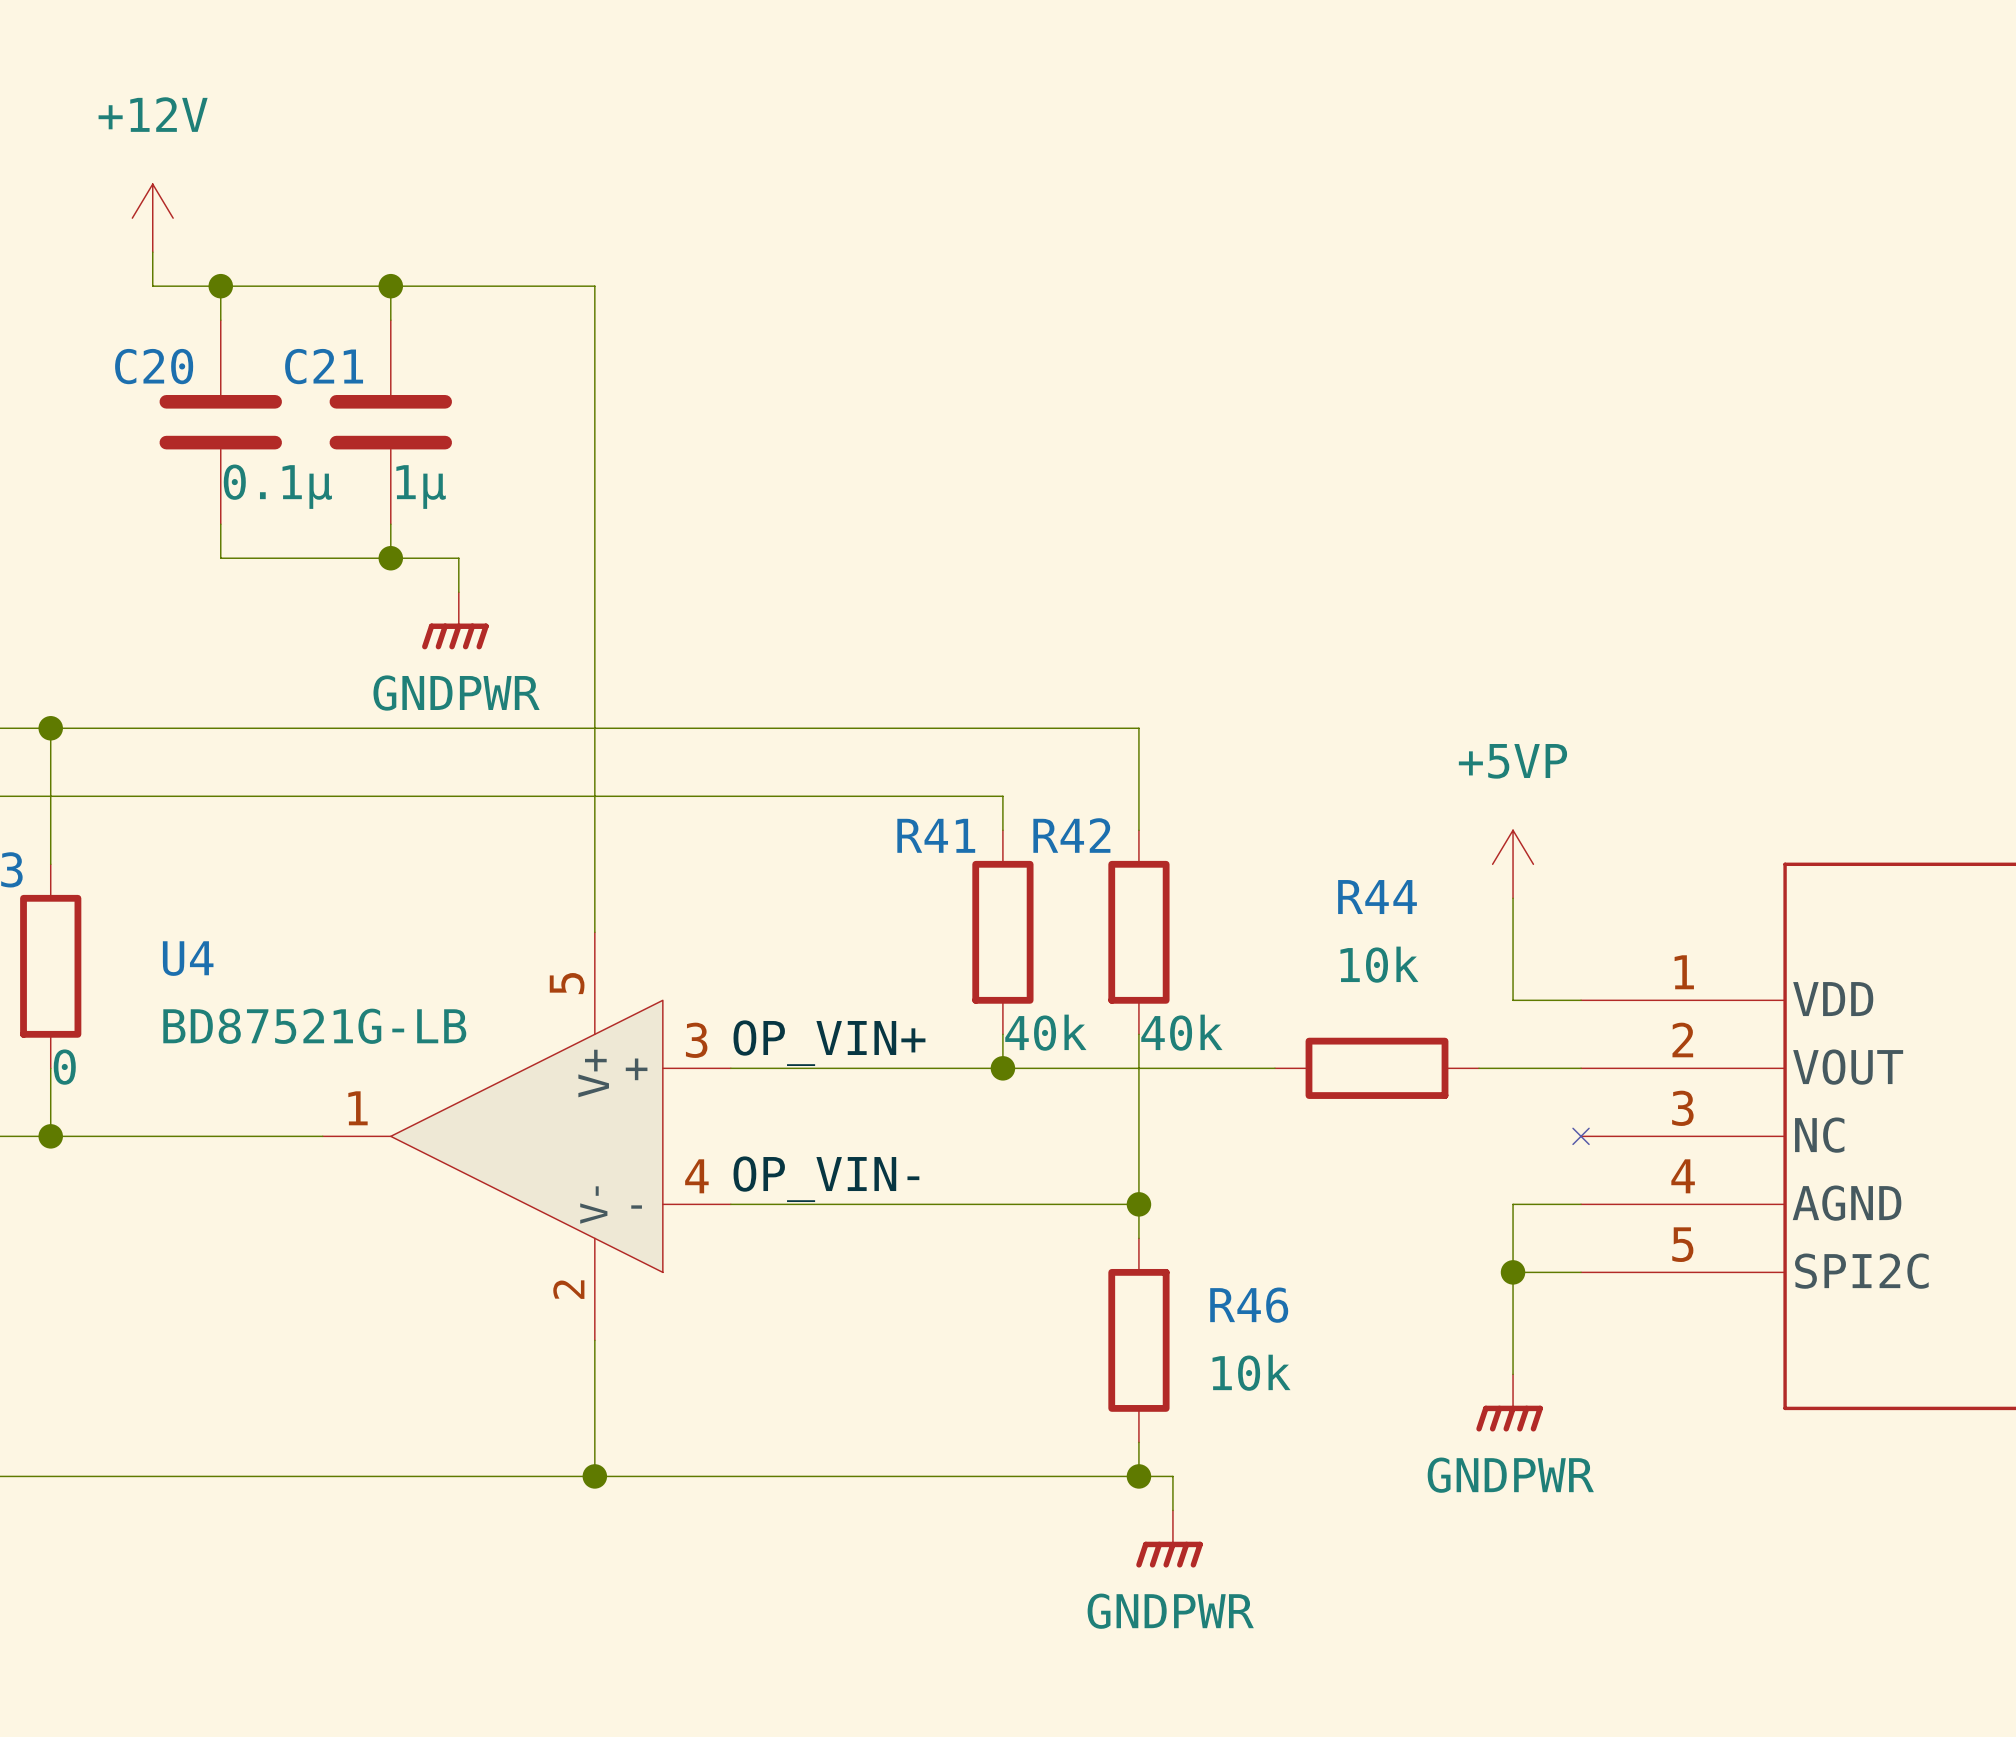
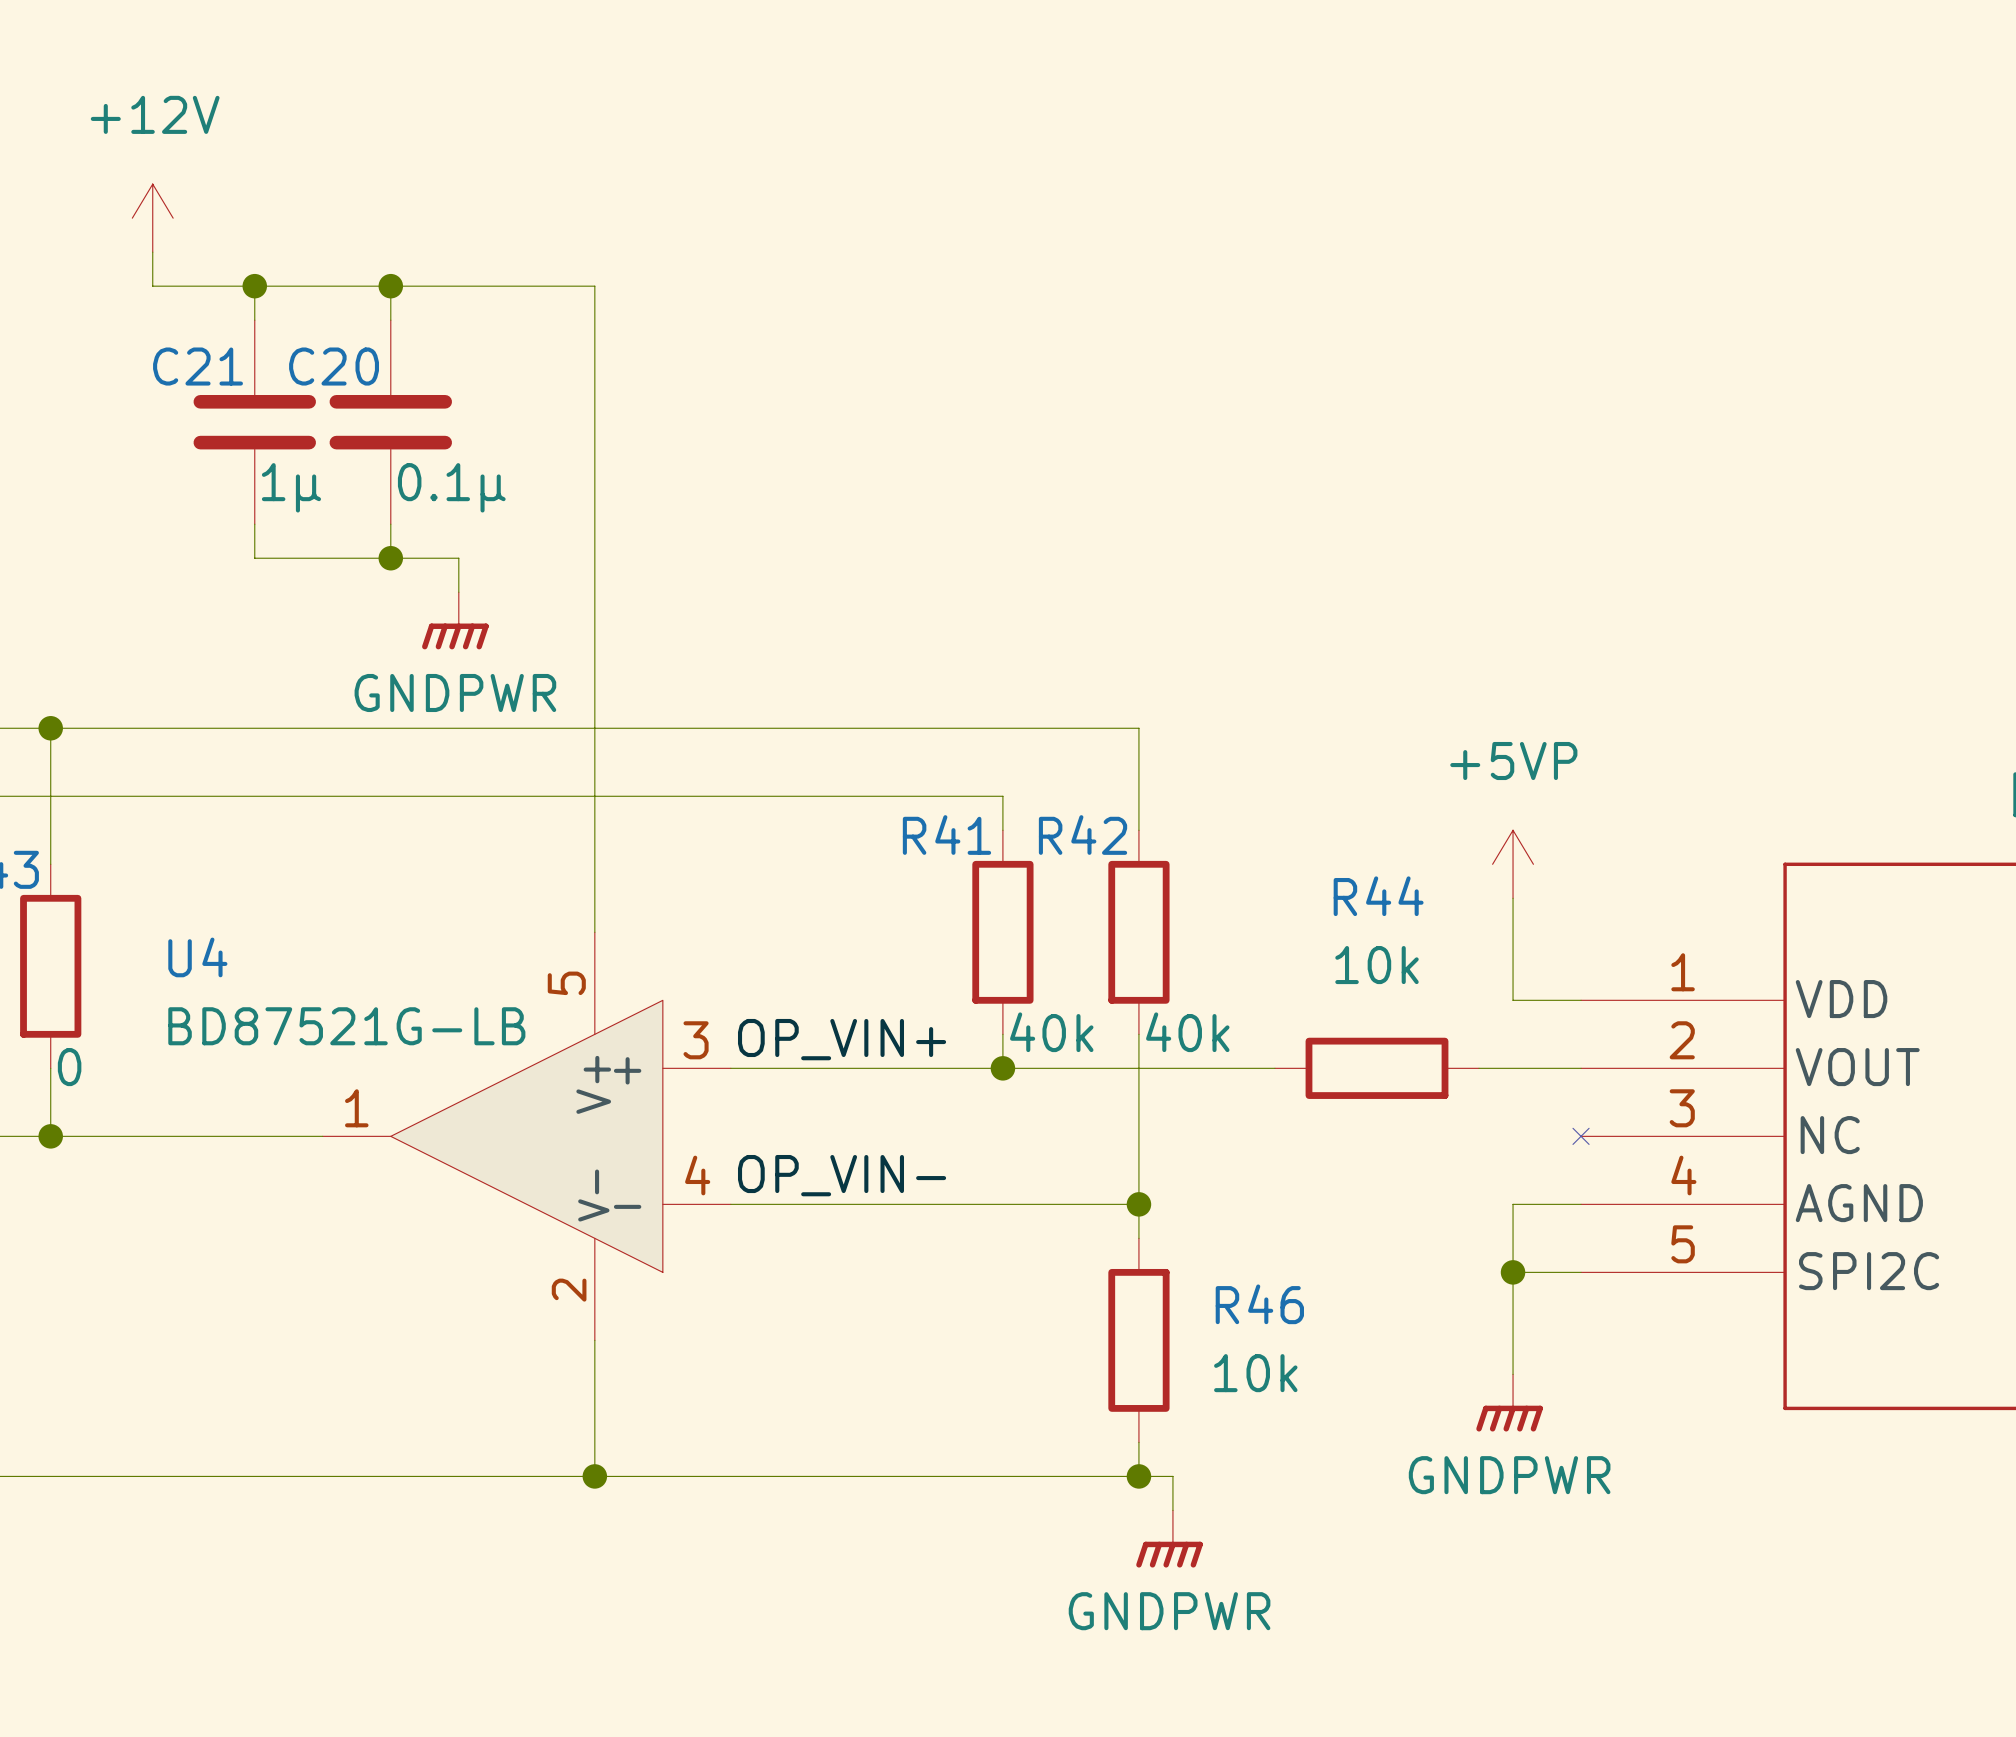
wire: (220, 286) (220, 320) -> (254, 286) (254, 320)
junction position: (220, 286) -> (254, 286)
C21 name: C21 (324, 366) -> C20 (334, 366)
C20: 0.1μ (220, 422) -> none
C21: none -> 1μ (254, 422)
C21 value: 1μ (421, 487) -> 0.1μ (451, 487)
wire: (220, 524) (220, 558) (254, 558) -> (254, 524) (254, 558)

